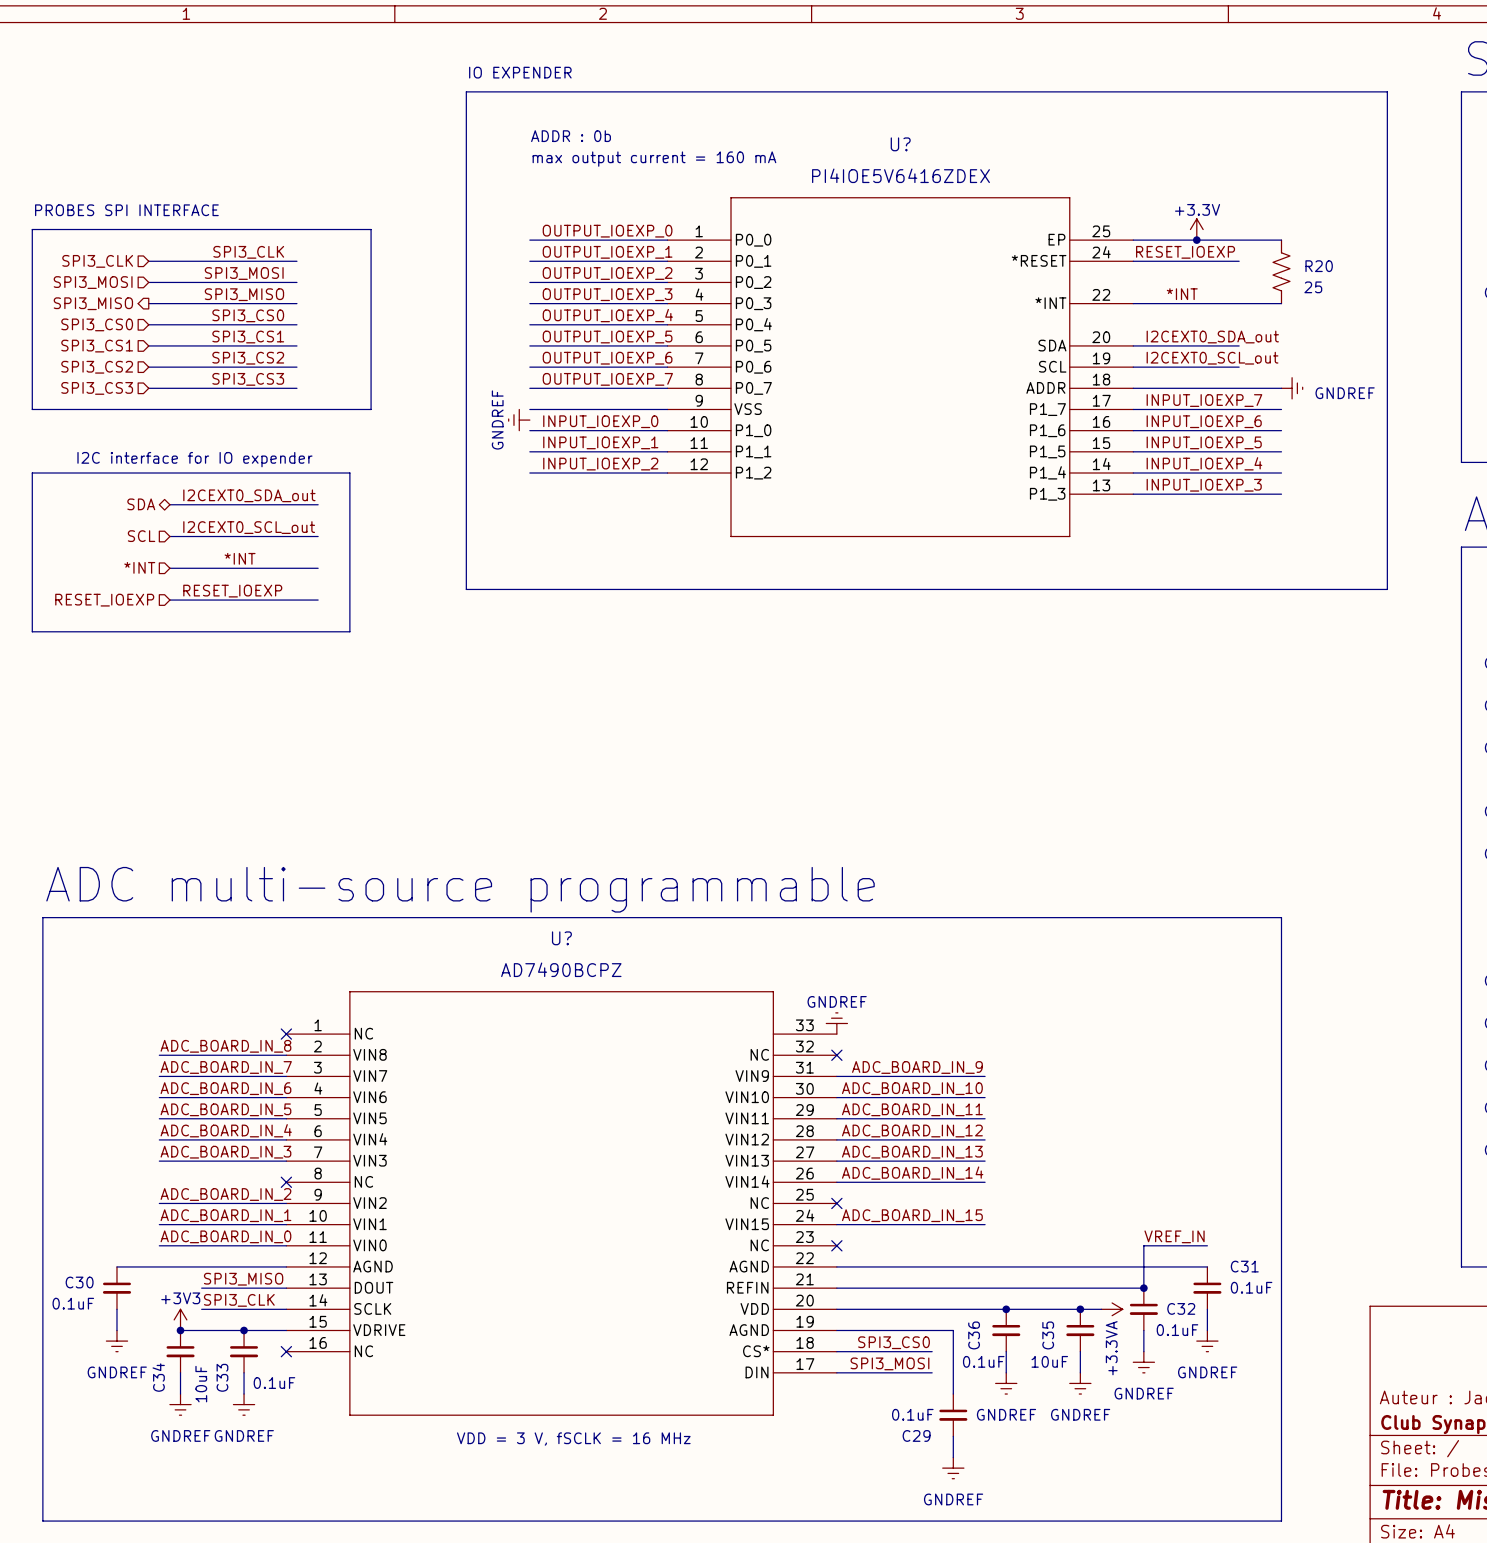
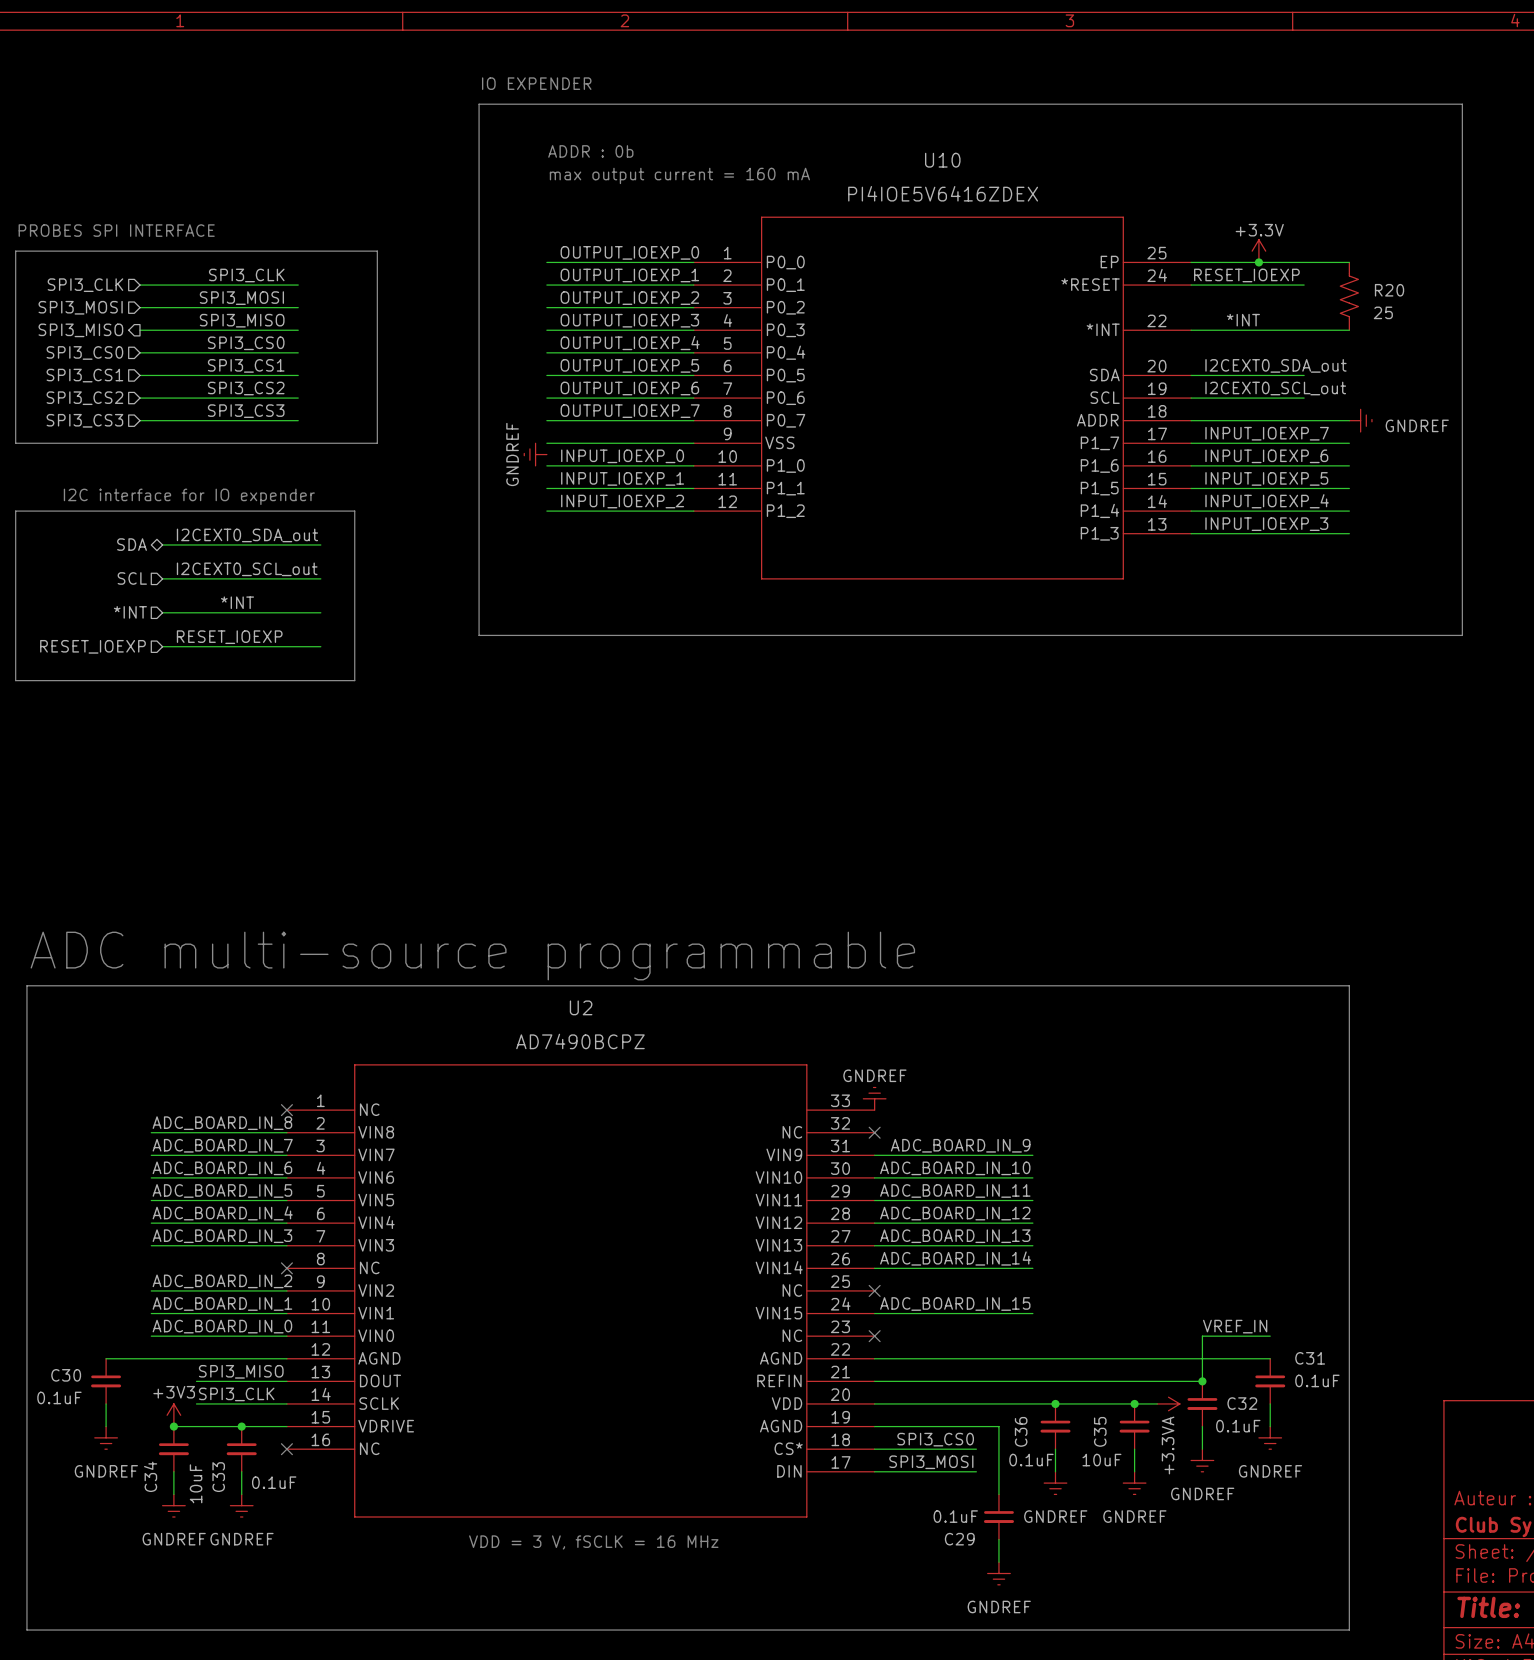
U? name: U? (900, 144) -> U10 (942, 160)
U? name: U? (561, 938) -> U2 (581, 1007)

